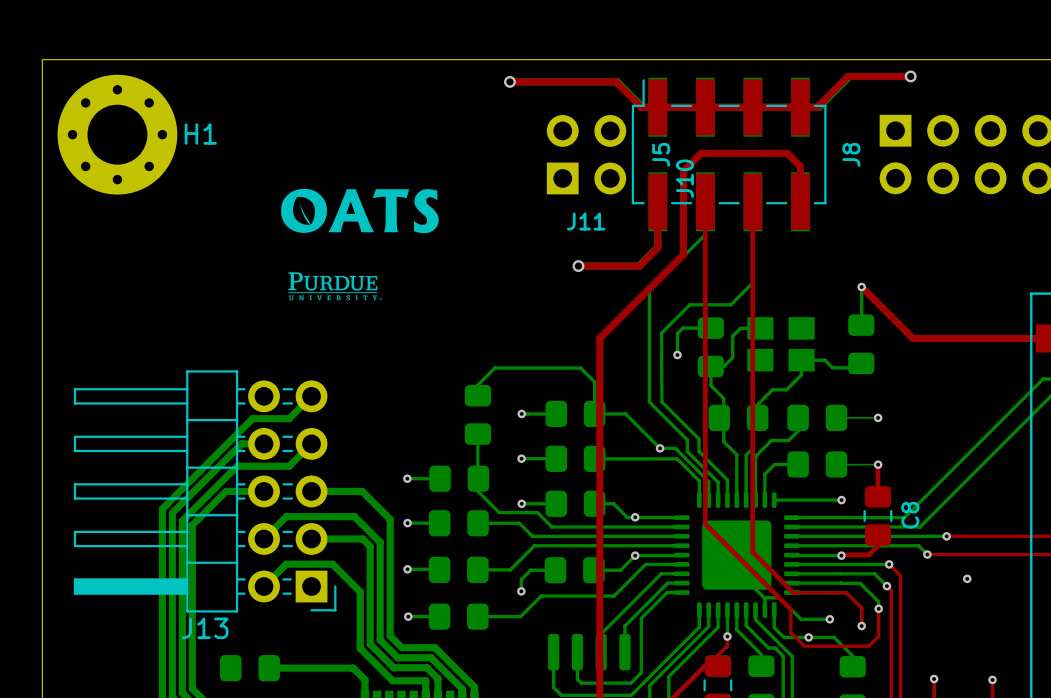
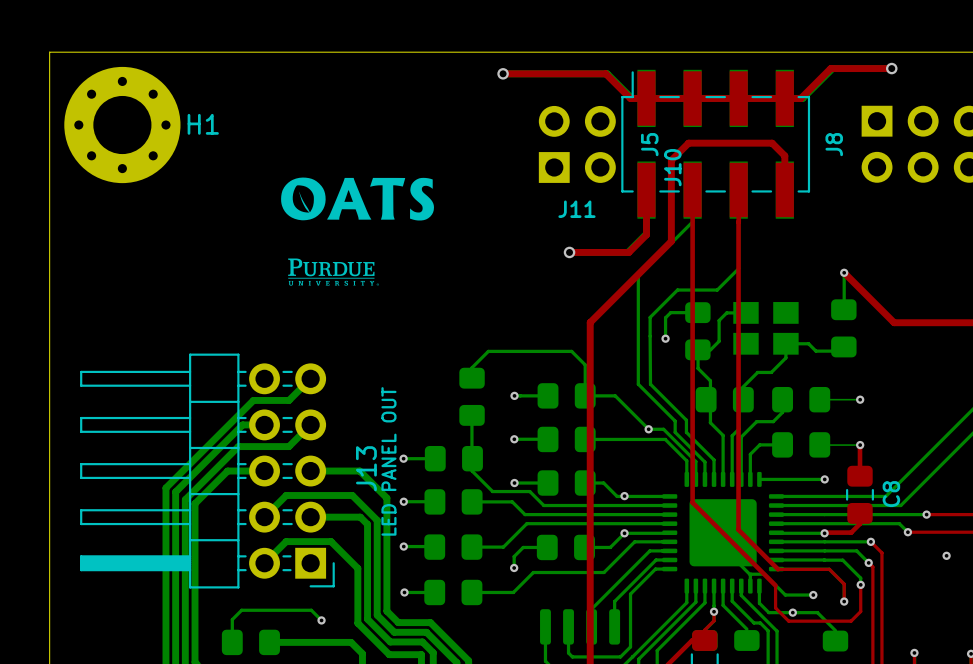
text: none -> LED PANEL OUT (388, 461)
J13 name rotation: 0° (205, 628) -> 90° counterclockwise (366, 468)
J13 name position: J13 (205, 628) -> J13 (366, 468)
bottom track: none -> (321, 620) (311, 610) (241, 610) (232, 619) (232, 642)
via: none -> (321, 620)

